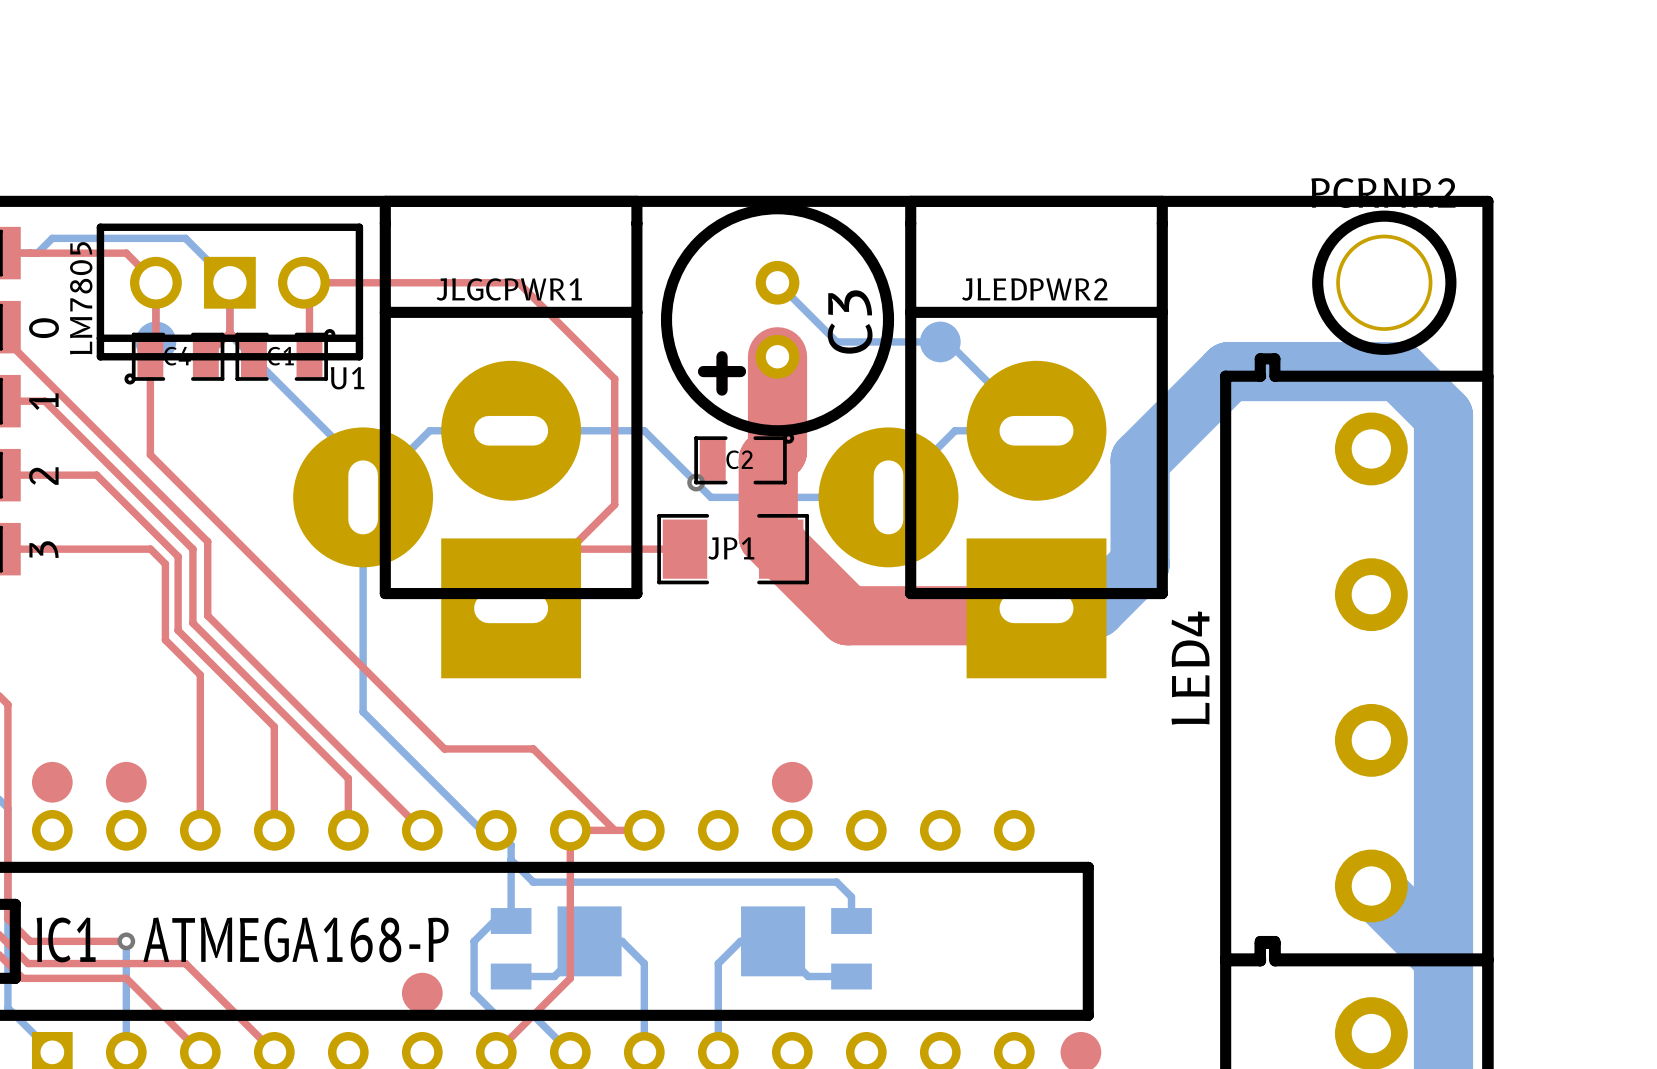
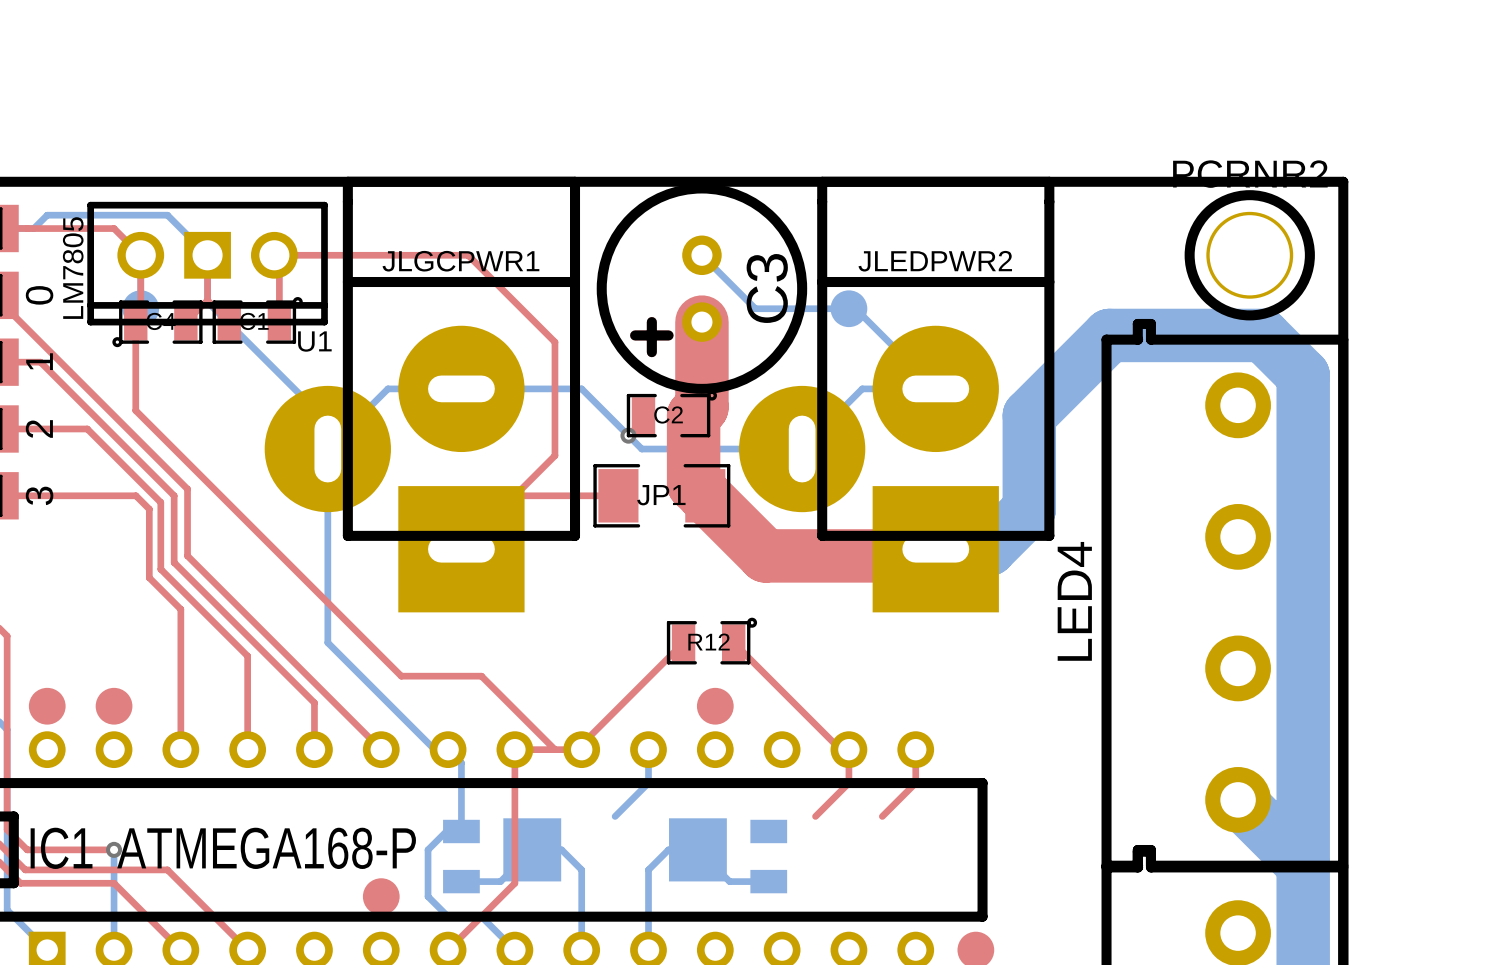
R12: none -> (711, 641)
top track: none -> (683, 642) (581, 744) (581, 749)
top track: none -> (733, 642) (840, 749) (848, 749) (848, 783) (815, 816)
bottom track: none -> (648, 749) (648, 783) (615, 816)
top track: none -> (915, 749) (915, 783) (882, 816)
bottom track: (511, 859) (533, 882) (836, 882) (851, 896) (851, 921) -> none

